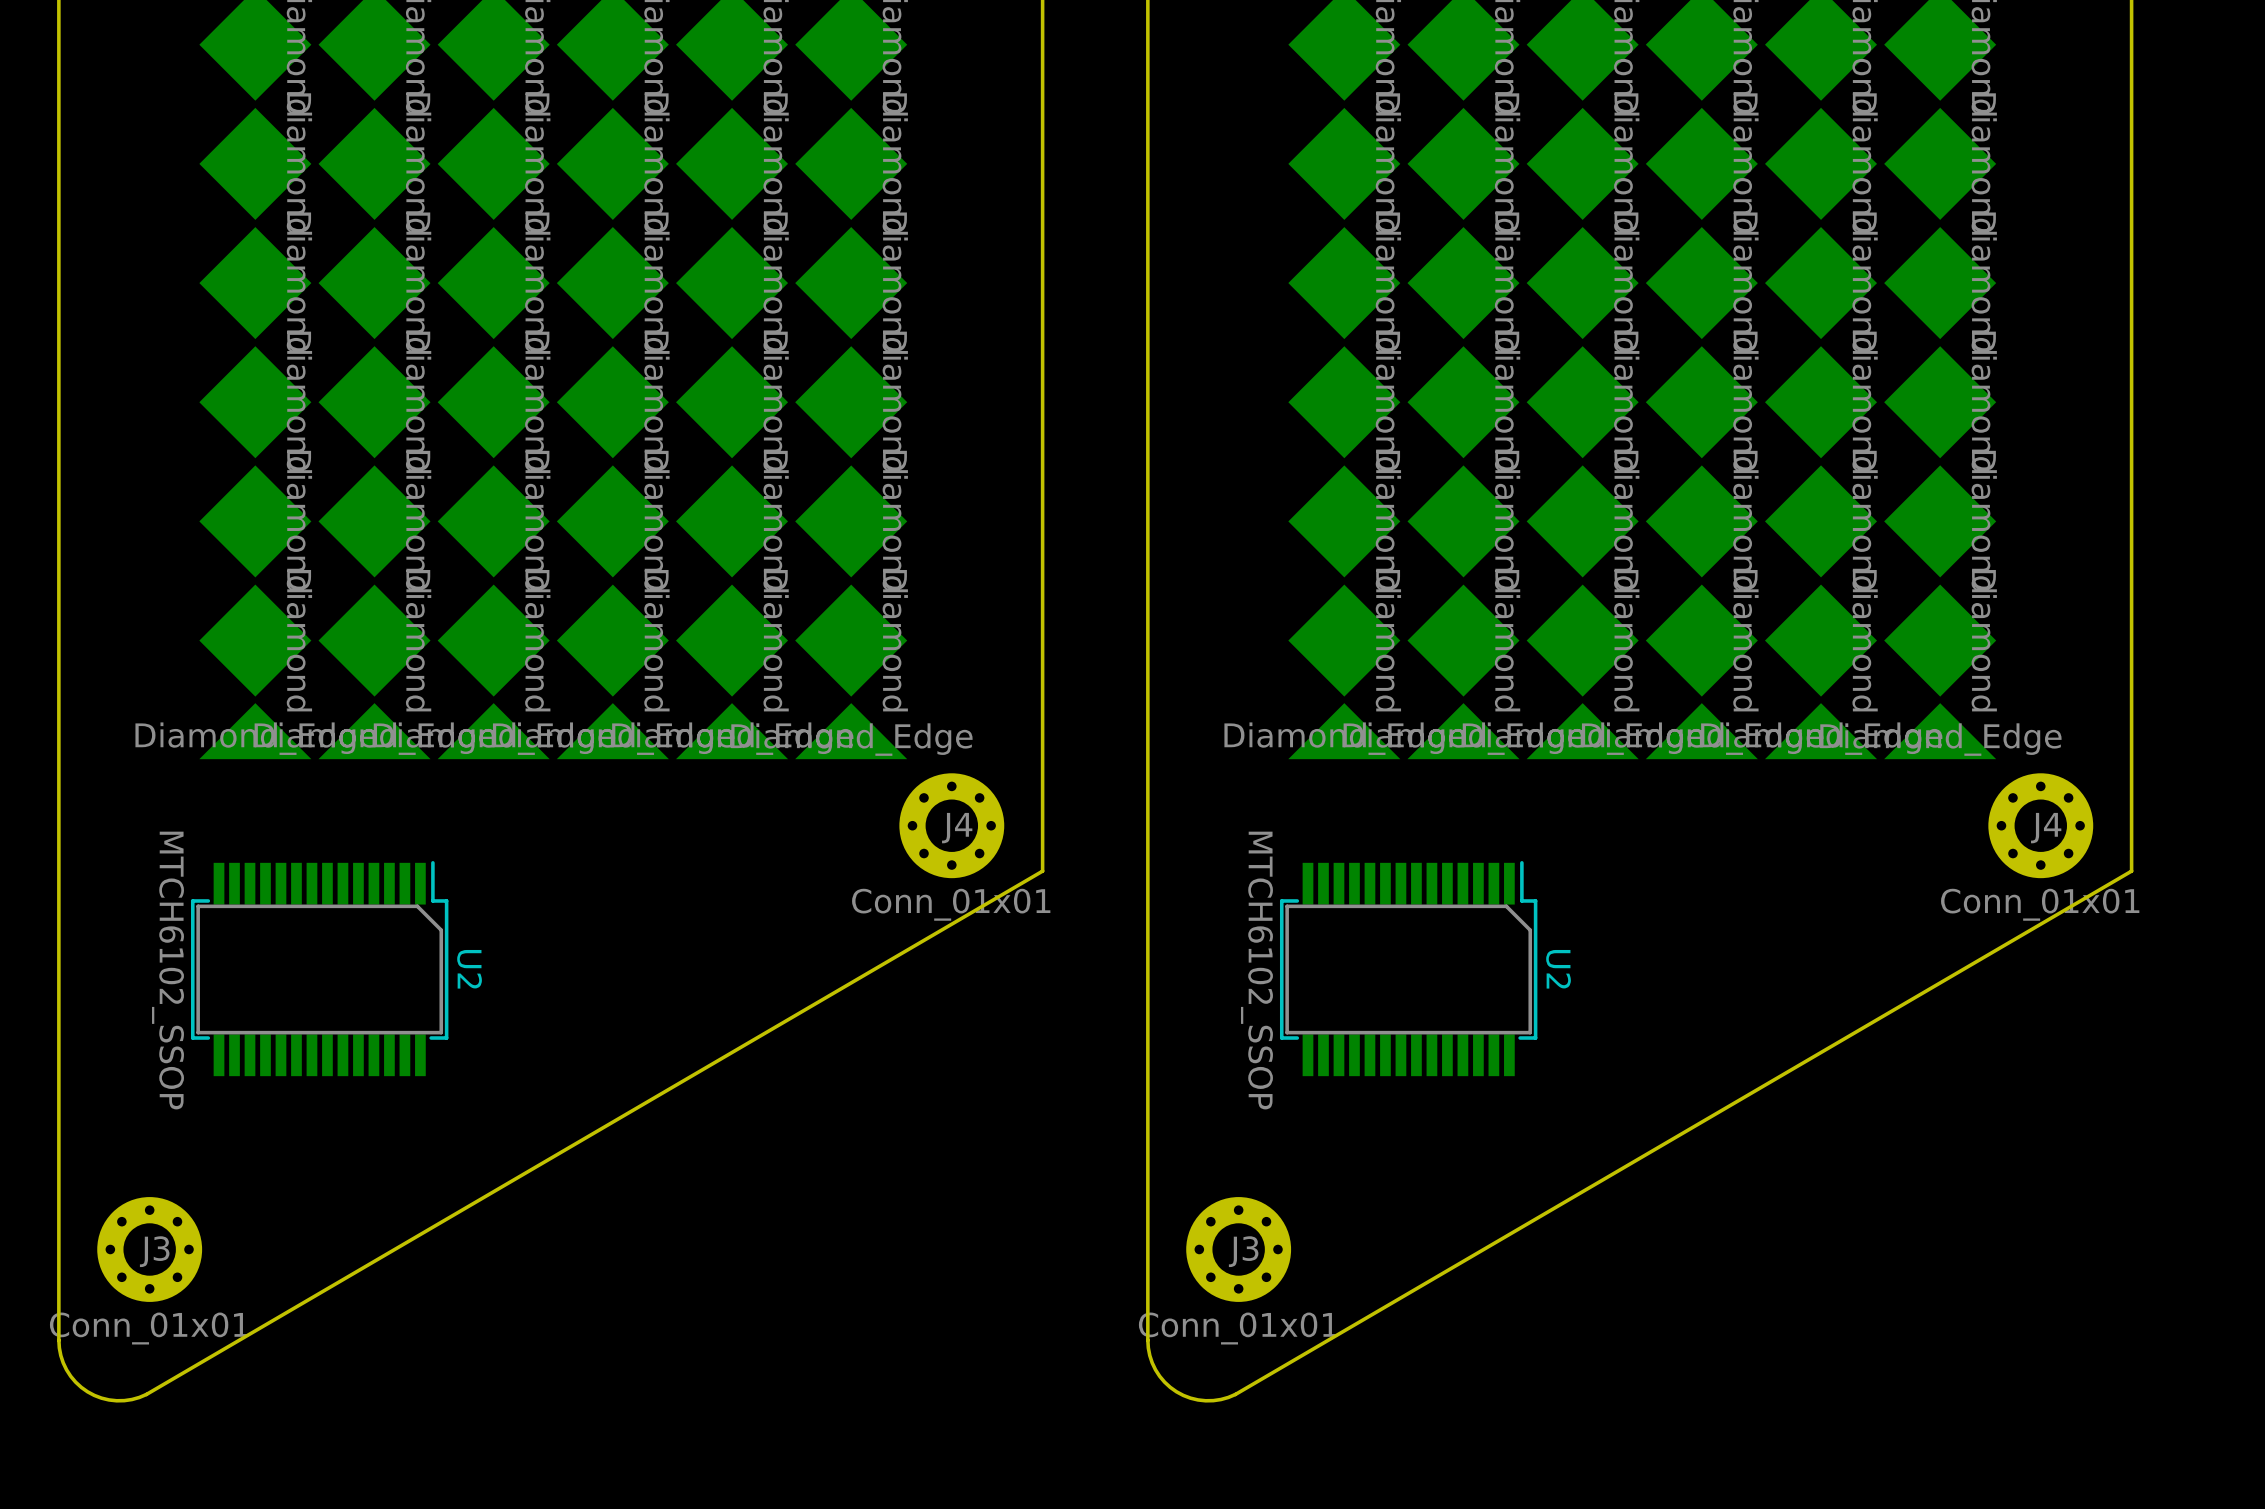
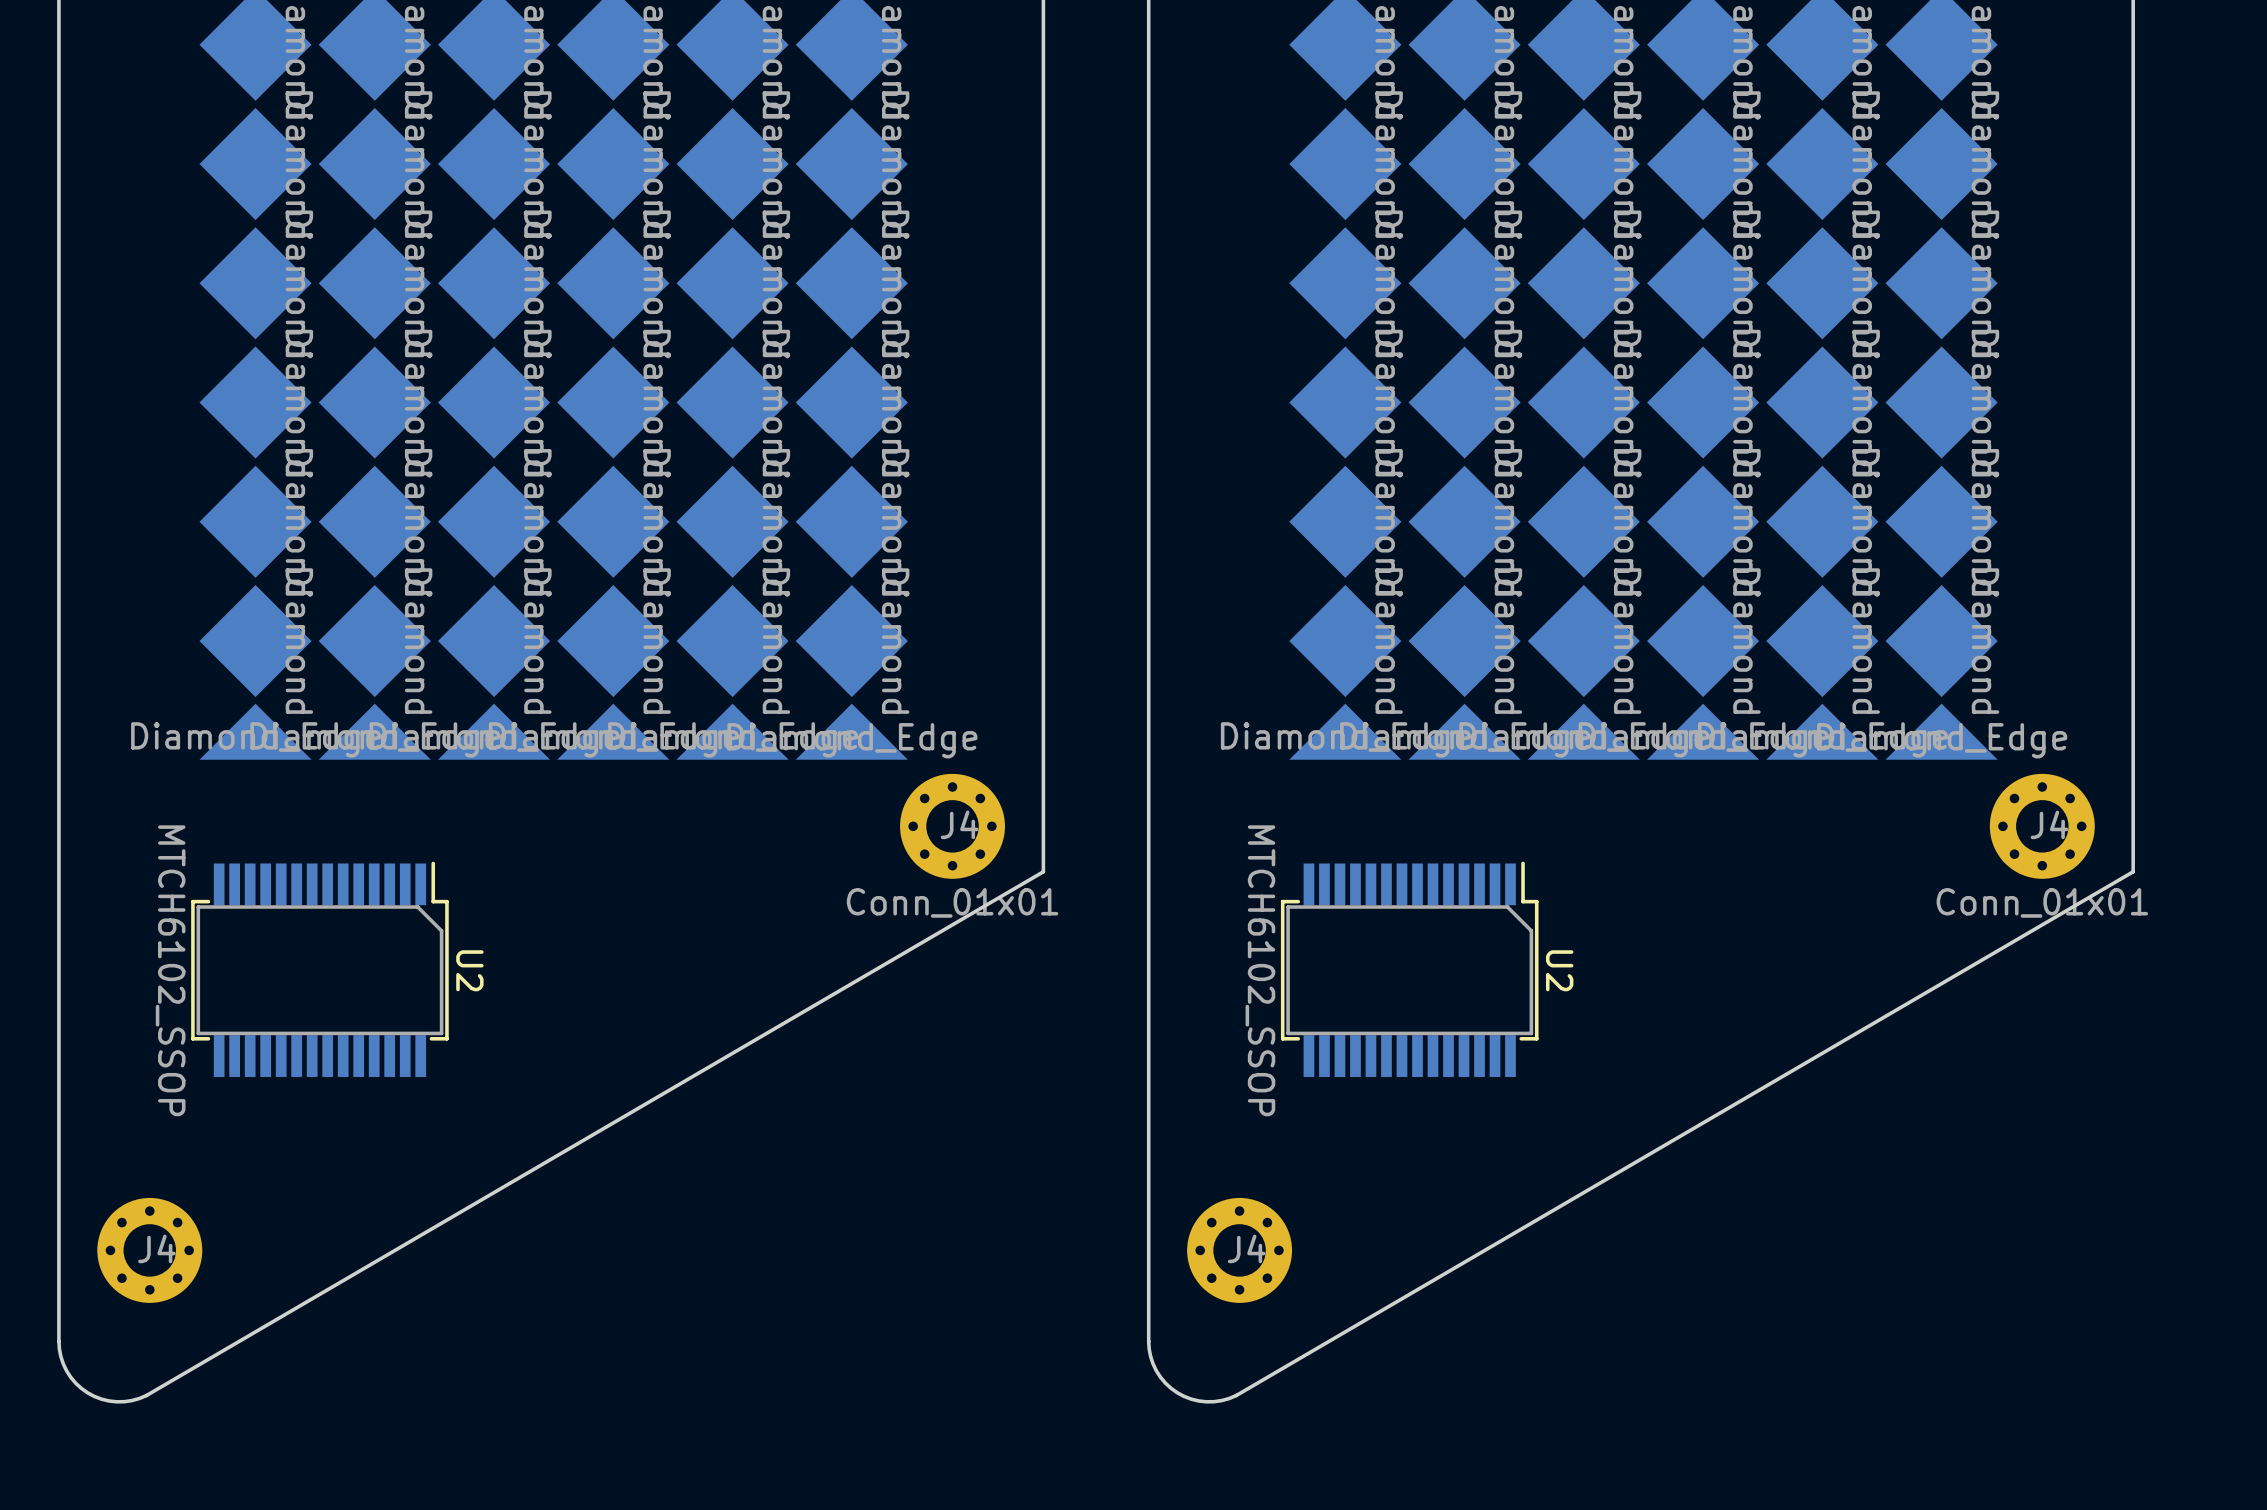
J3 name: J3 (154, 1251) -> J4 (156, 1248)
J3 name: J3 (1243, 1251) -> J4 (1246, 1248)
J3 value: Conn_01x01 (149, 1328) -> none
J3 value: Conn_01x01 (1238, 1328) -> none

